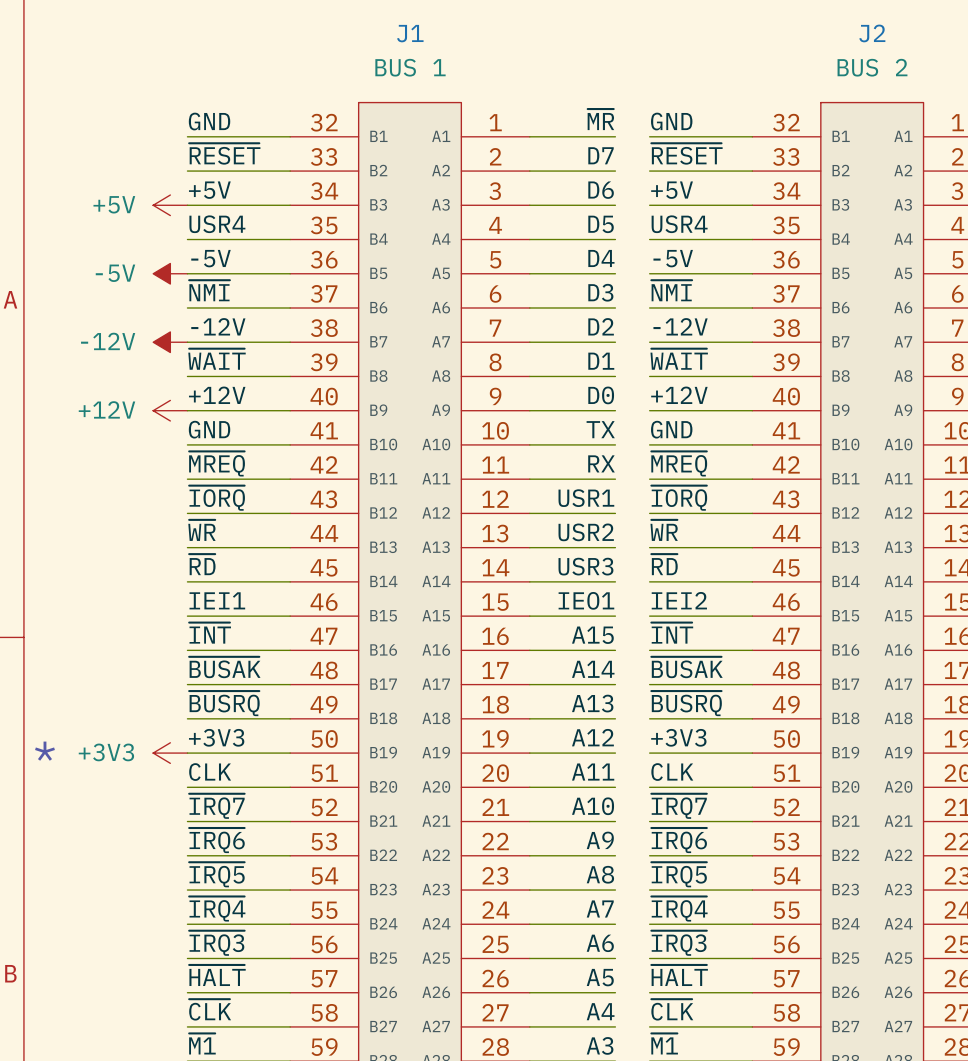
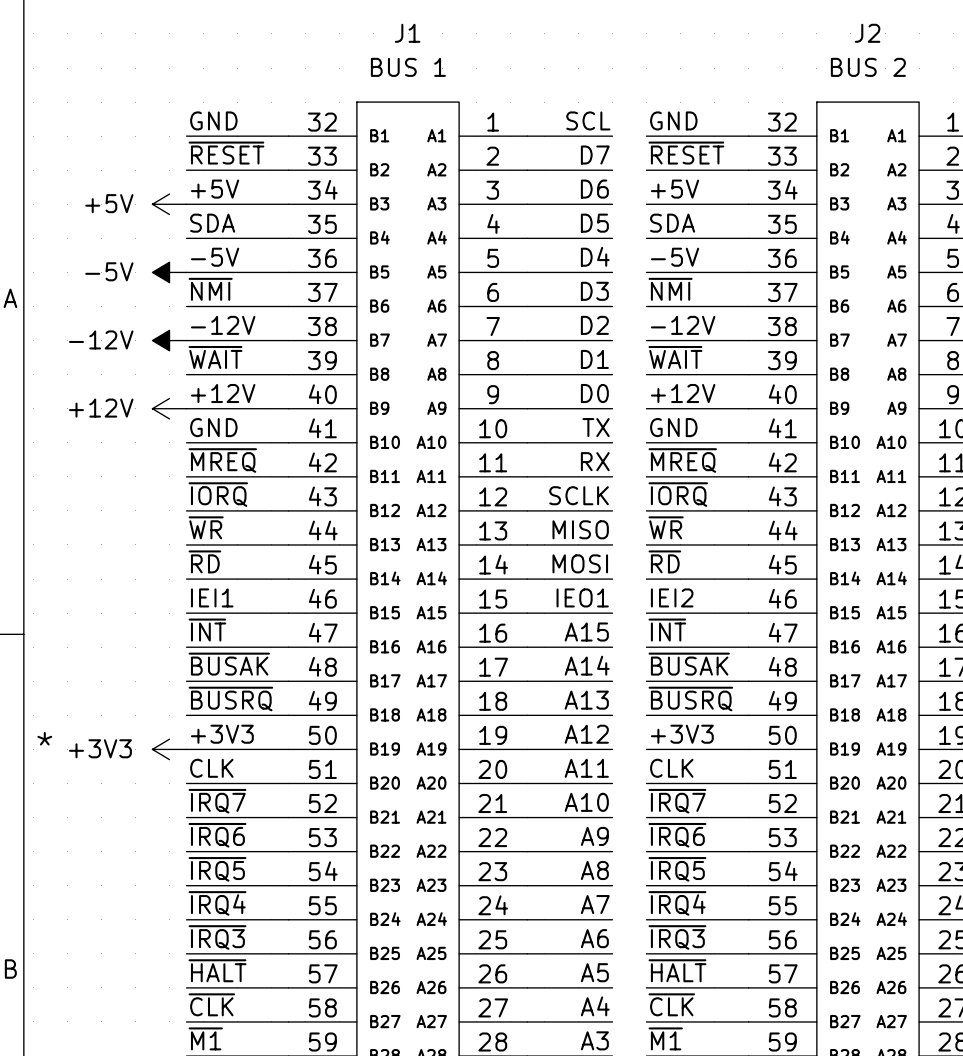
label: ~{MR} (600, 119) -> SCL (588, 120)
label: USR4 (217, 224) -> SDA (212, 223)
label: USR4 (679, 224) -> SDA (672, 223)
label: USR1 (586, 498) -> SCLK (579, 495)
label: USR2 (586, 532) -> MISO (580, 529)
label: USR3 (585, 566) -> MOSI (580, 563)

